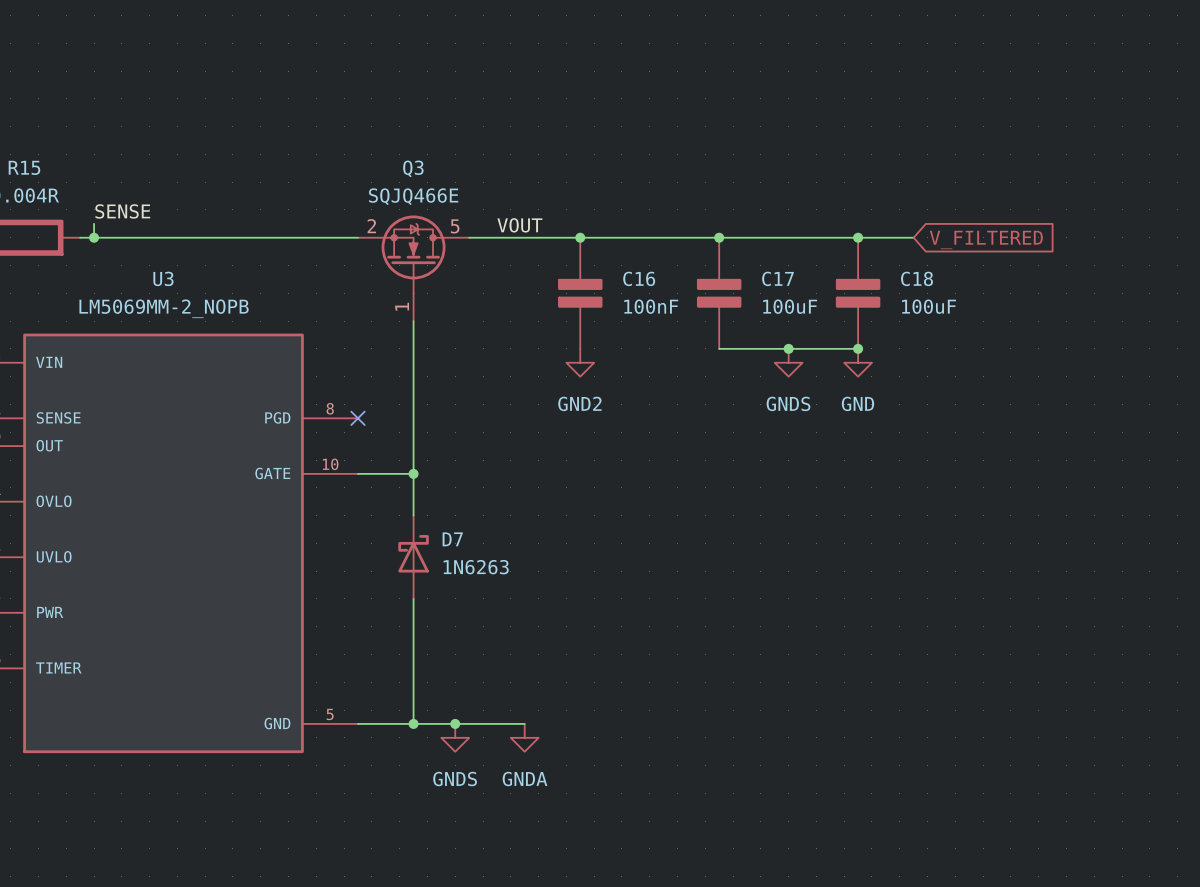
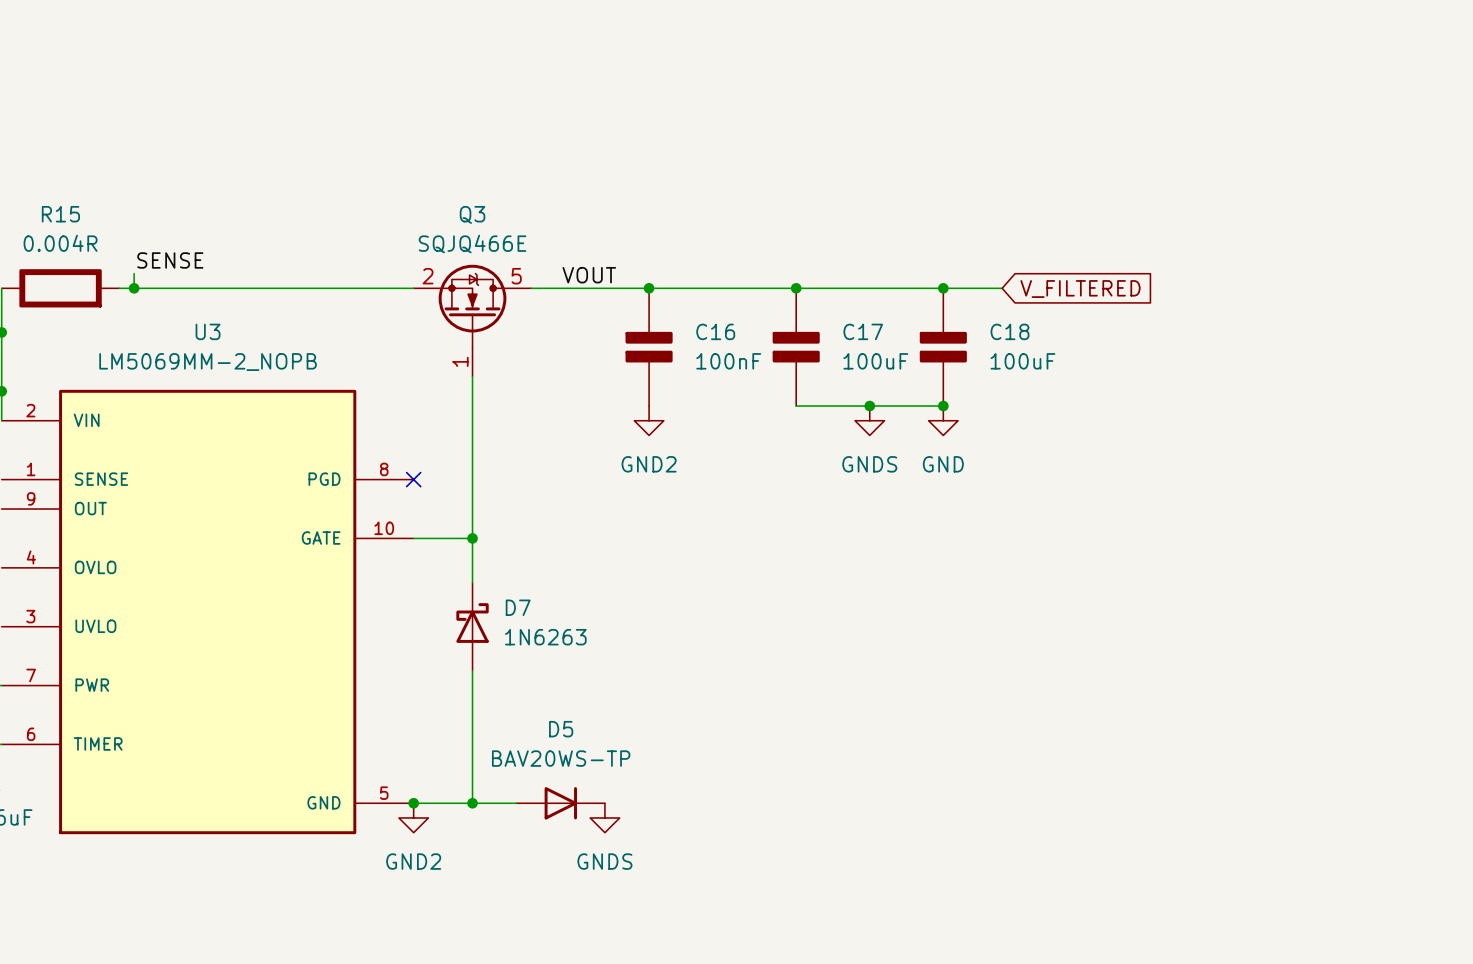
junction: none -> (413, 803)
junction: (455, 723) -> none
D5: none -> BAV20WS-TP (560, 803)
power symbol: none -> GND2 (413, 817)
power symbol position: GNDS (455, 737) -> GNDS (604, 817)
power symbol: GNDA (524, 737) -> none

